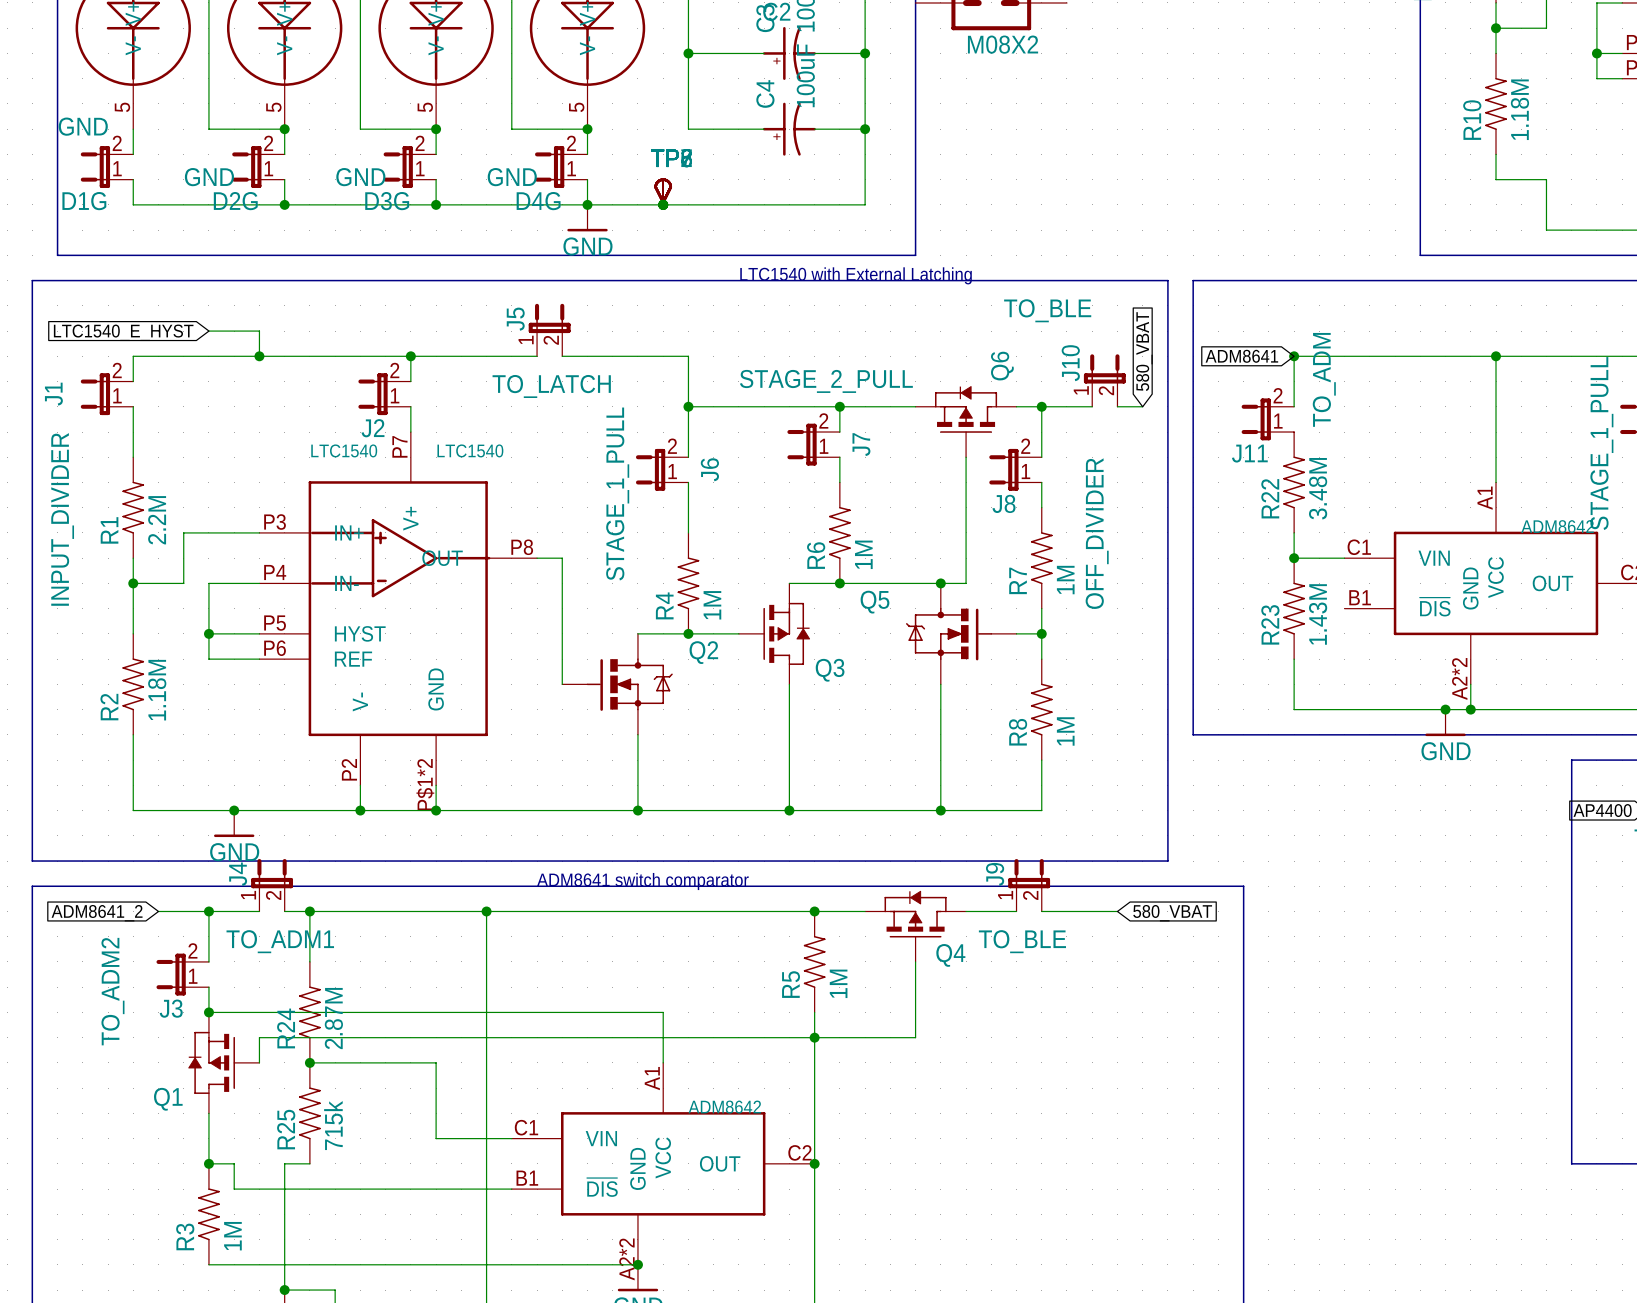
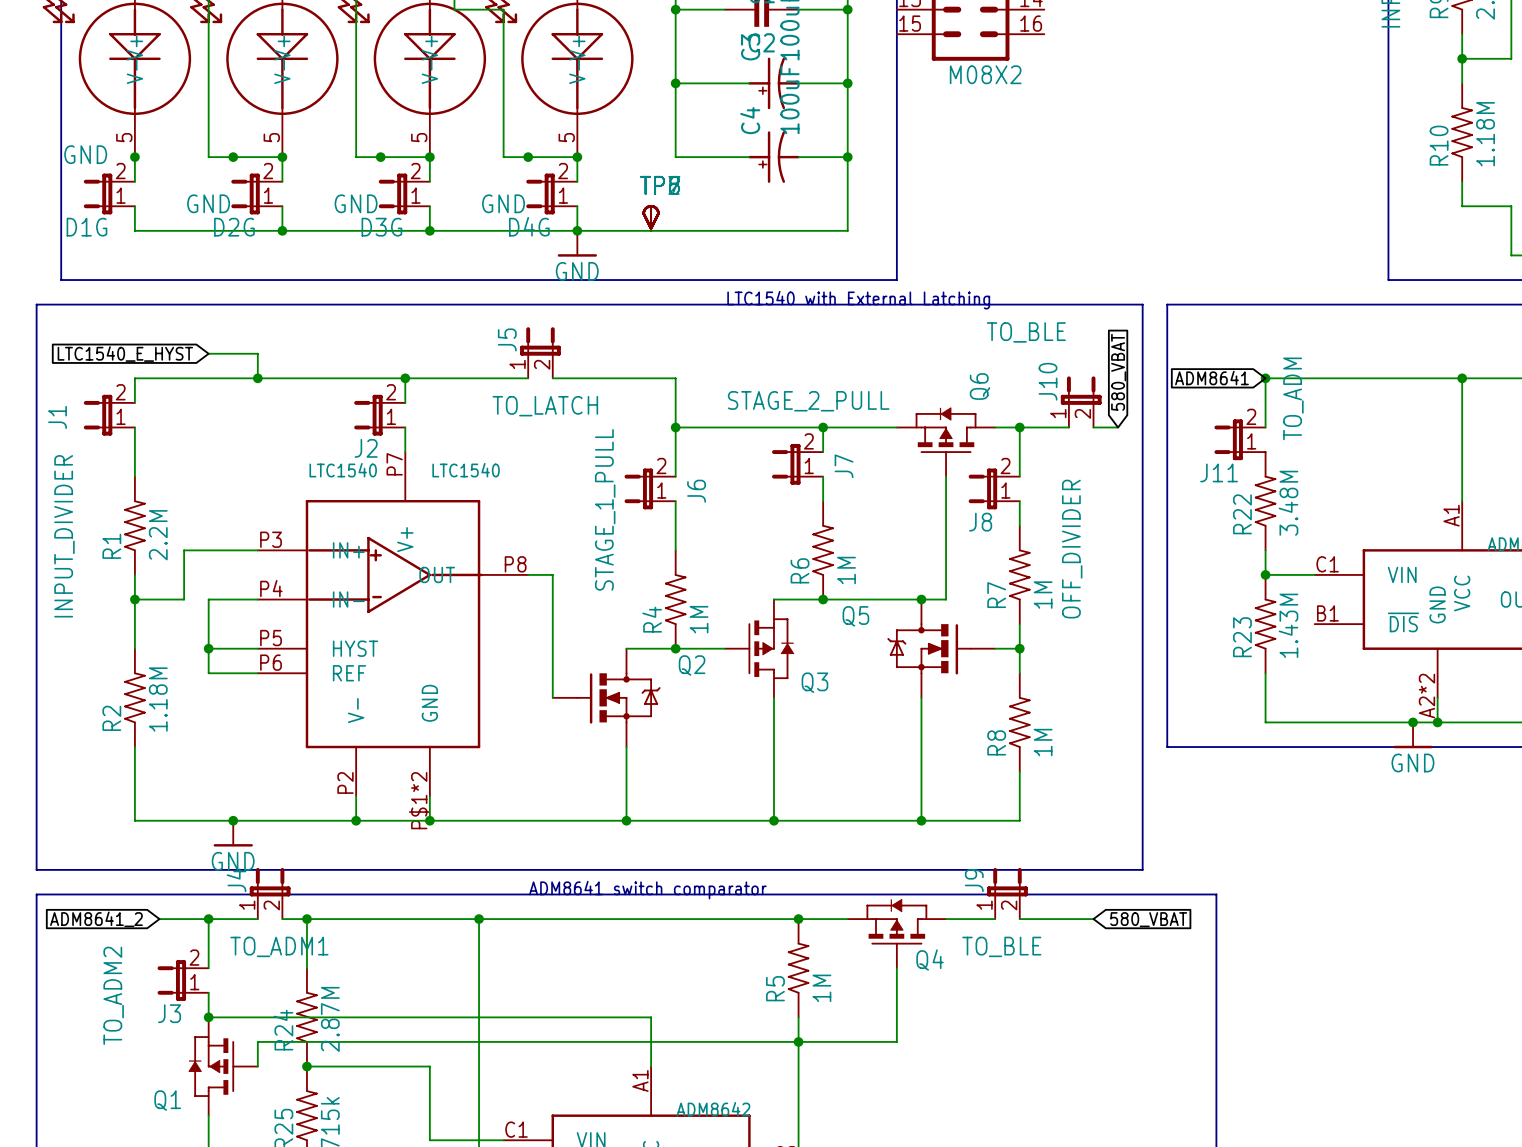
junction: none -> (134, 157)
junction: none -> (233, 157)
junction: none -> (380, 157)
junction: none -> (528, 157)
junction: (663, 204) -> none

